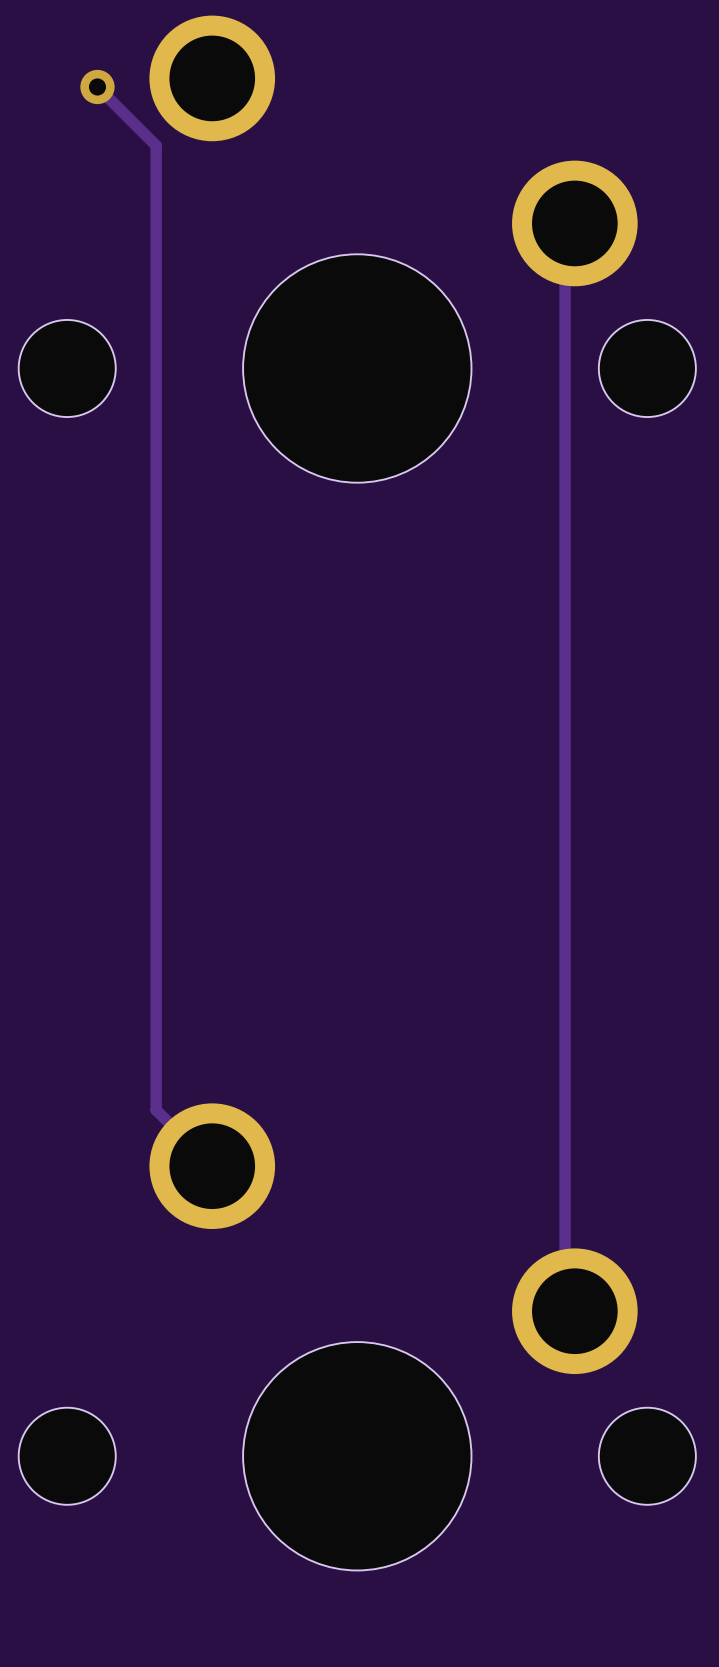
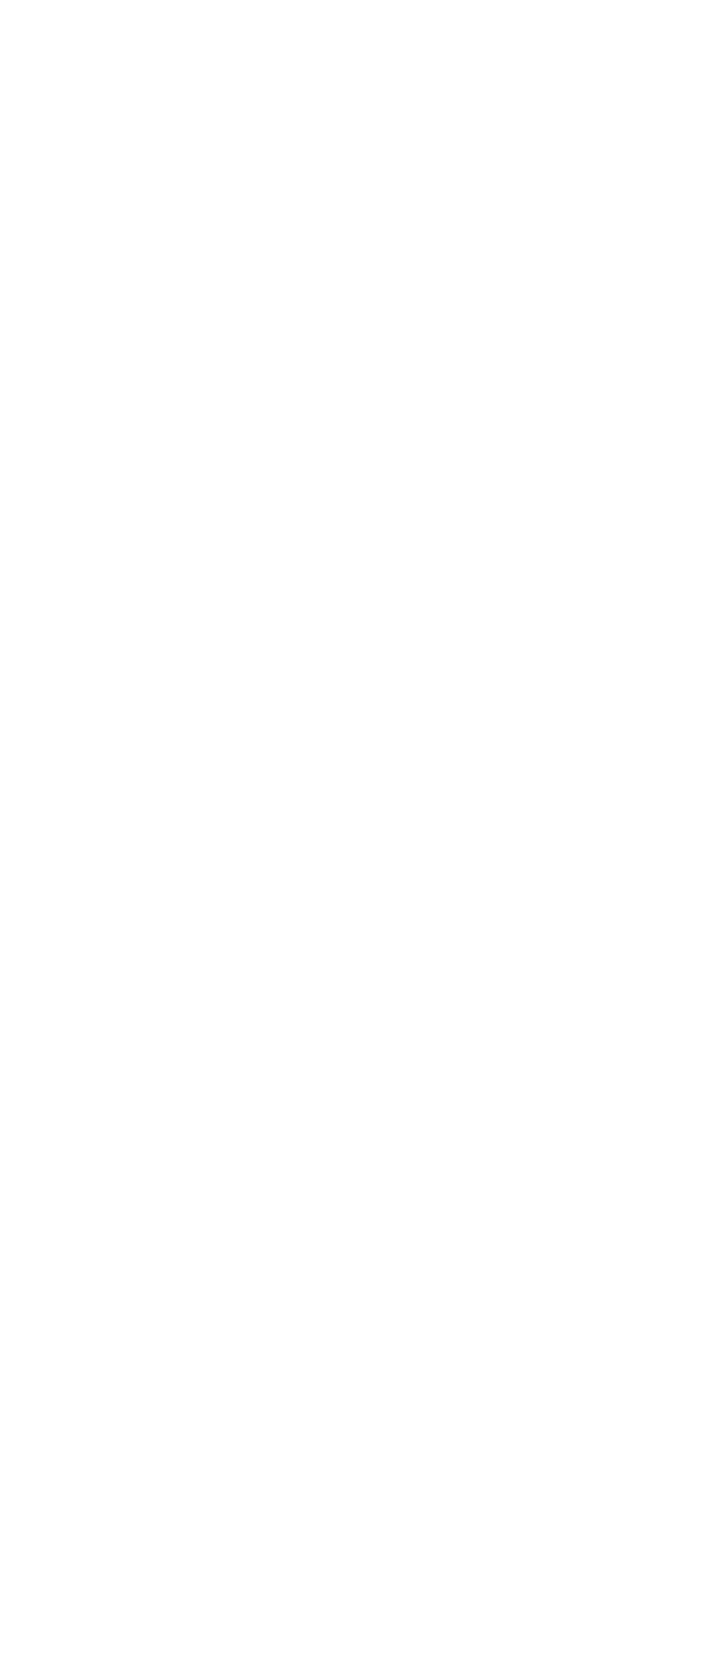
track: (97, 86) (156, 145) (156, 1110) (212, 1166) -> none
via: (97, 86) -> none
track: (574, 223) (565, 233) (565, 1301) (574, 1311) -> none
part: (357, 249) -> none
part: (357, 1336) -> none

